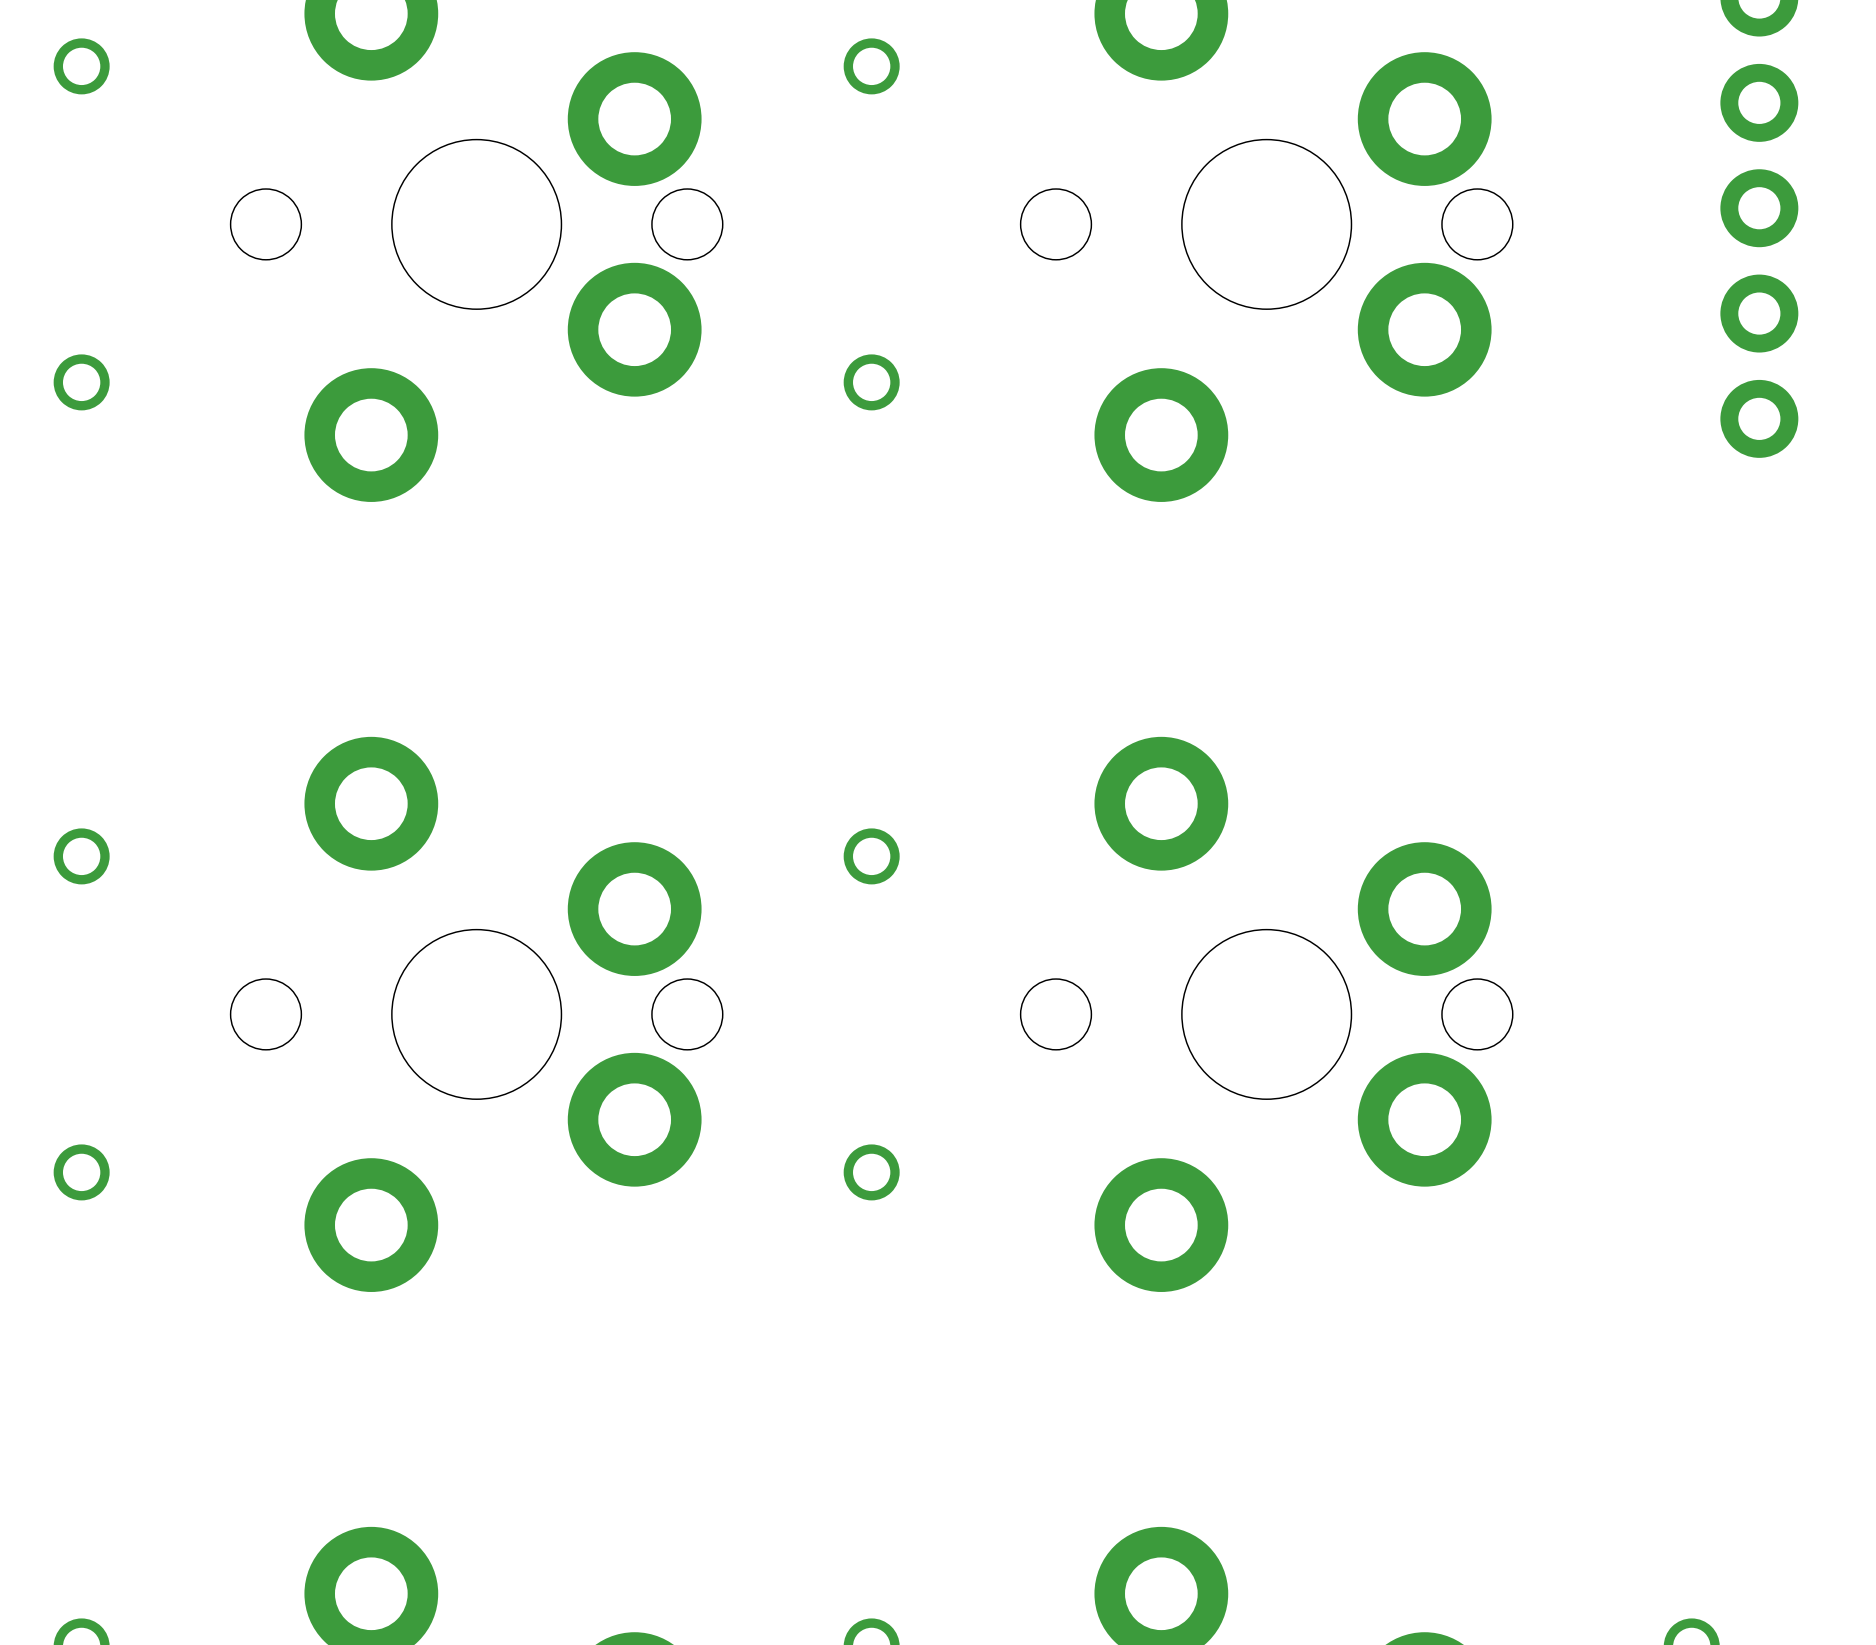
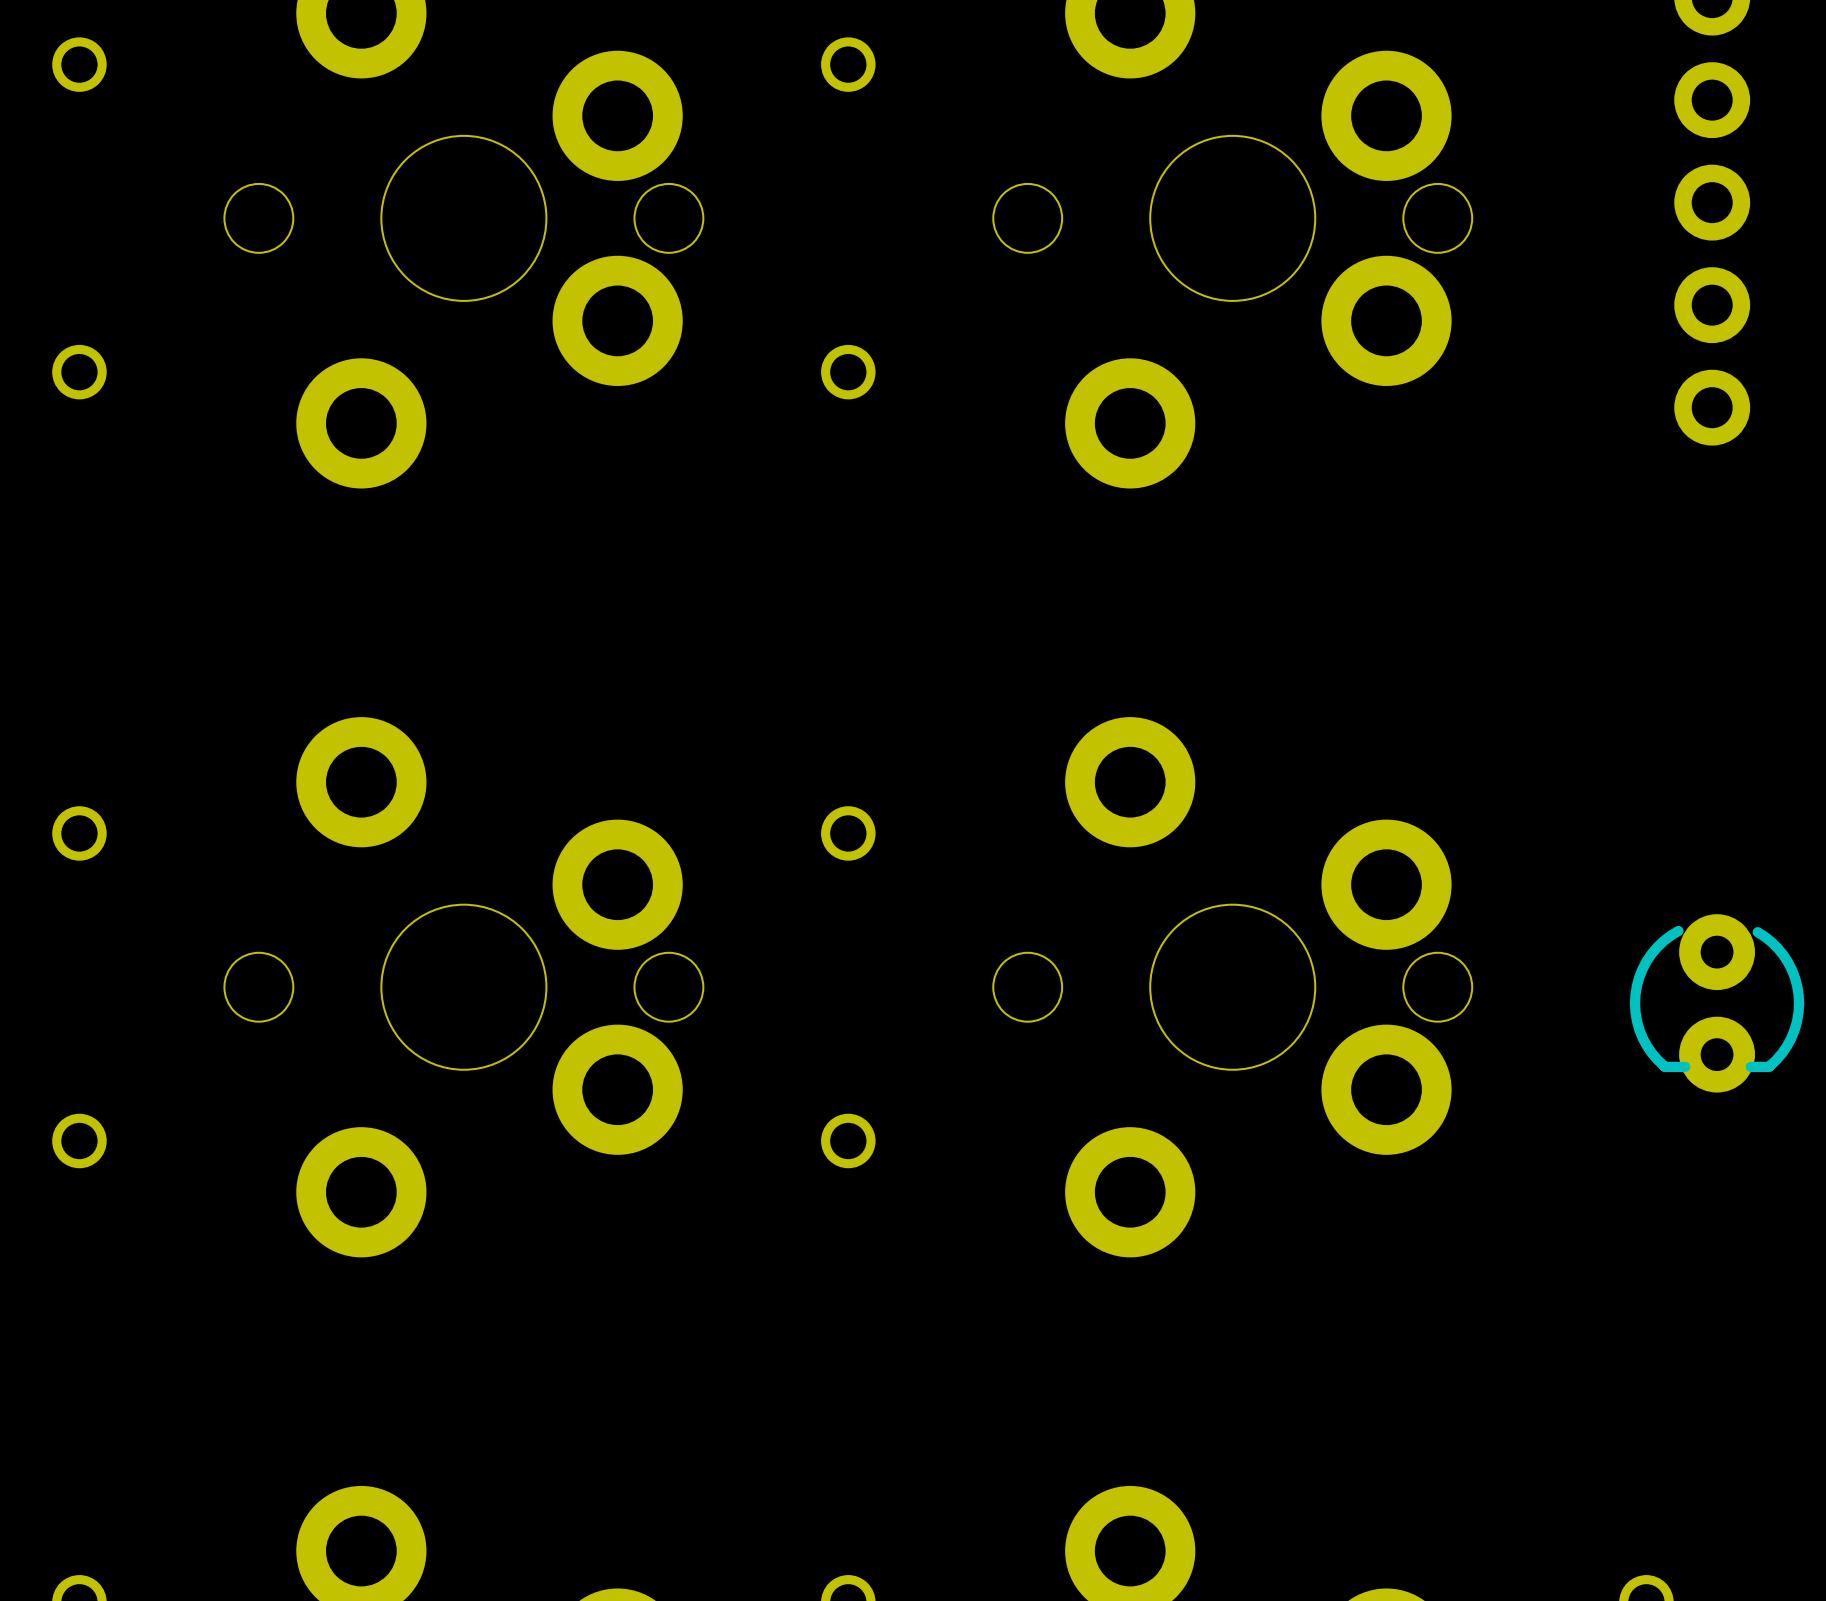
part: none -> (1717, 1003)

